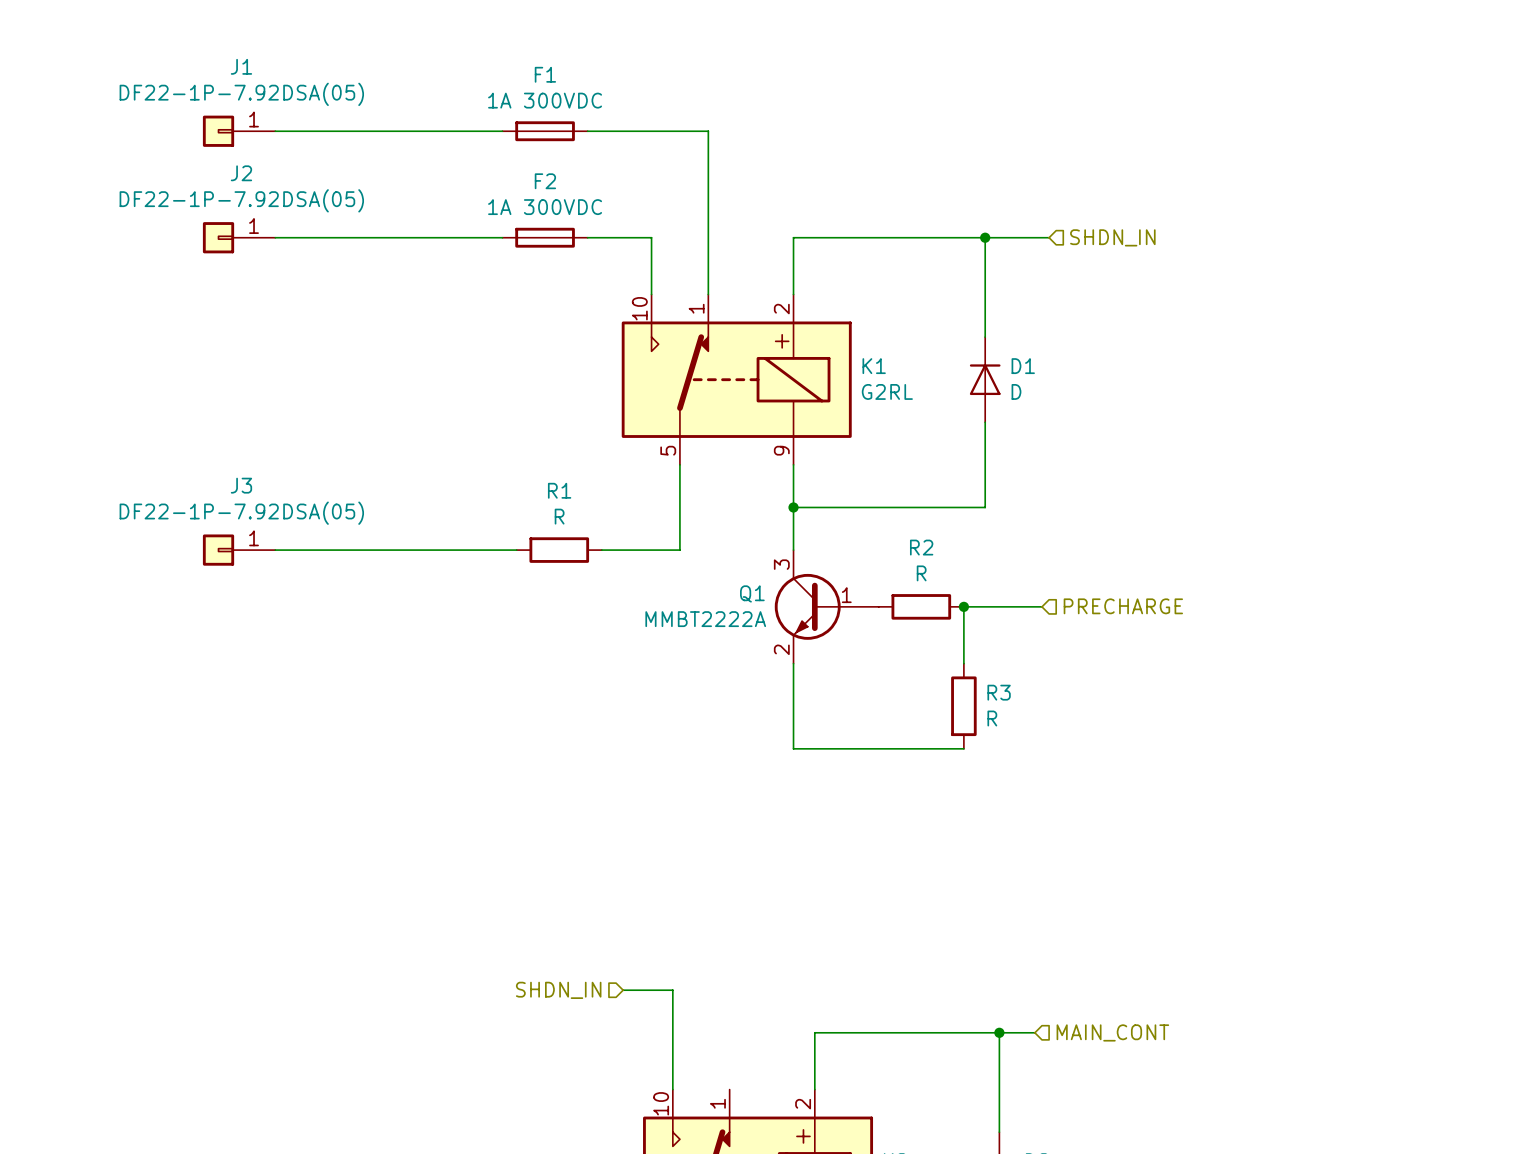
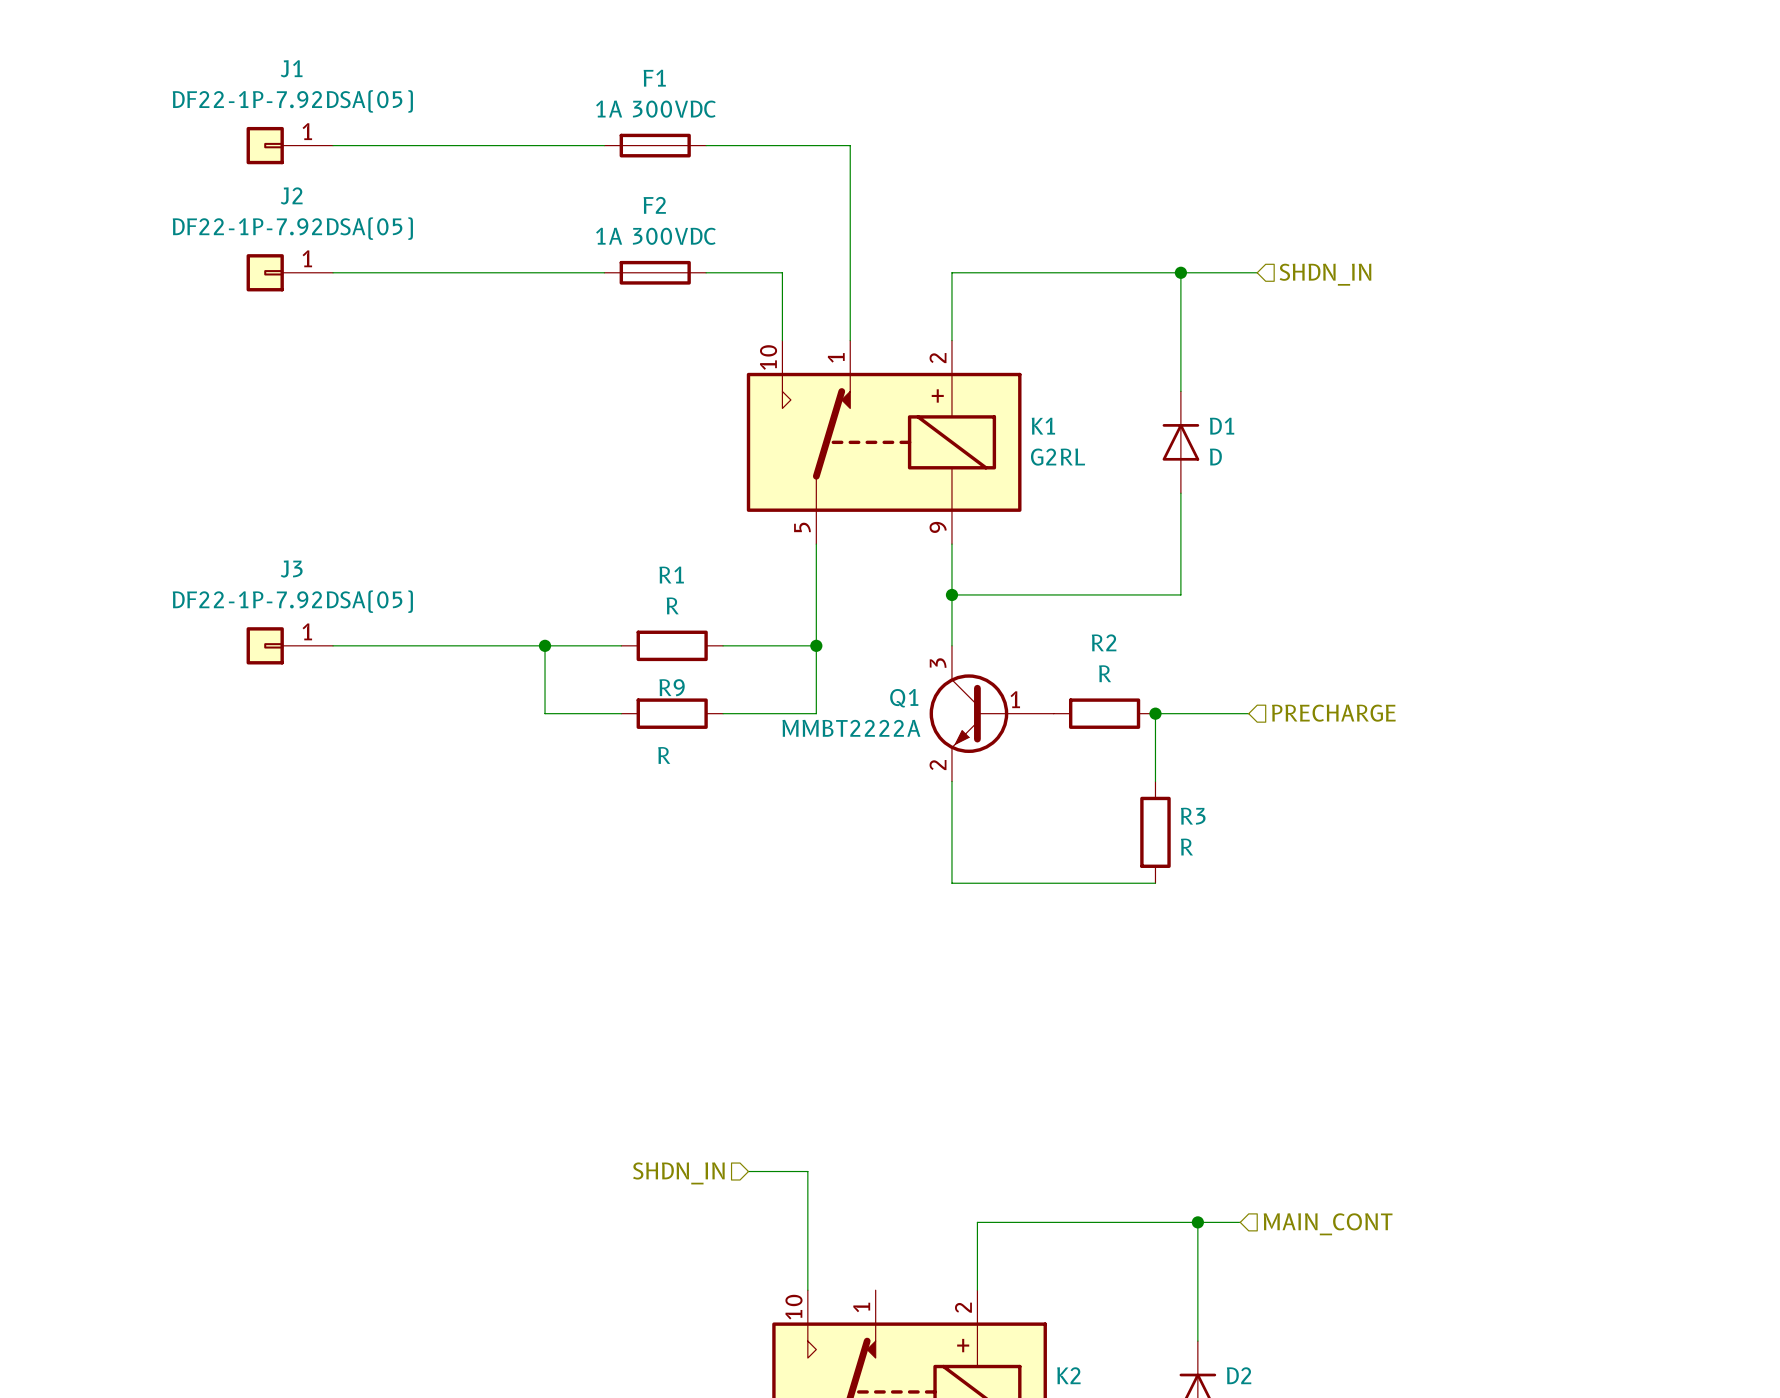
wire: none -> (545, 645) (545, 713) (621, 713)
junction: none -> (545, 645)
wire: none -> (816, 645) (816, 713) (723, 713)
junction: none -> (816, 645)
R9: none -> R (672, 713)

